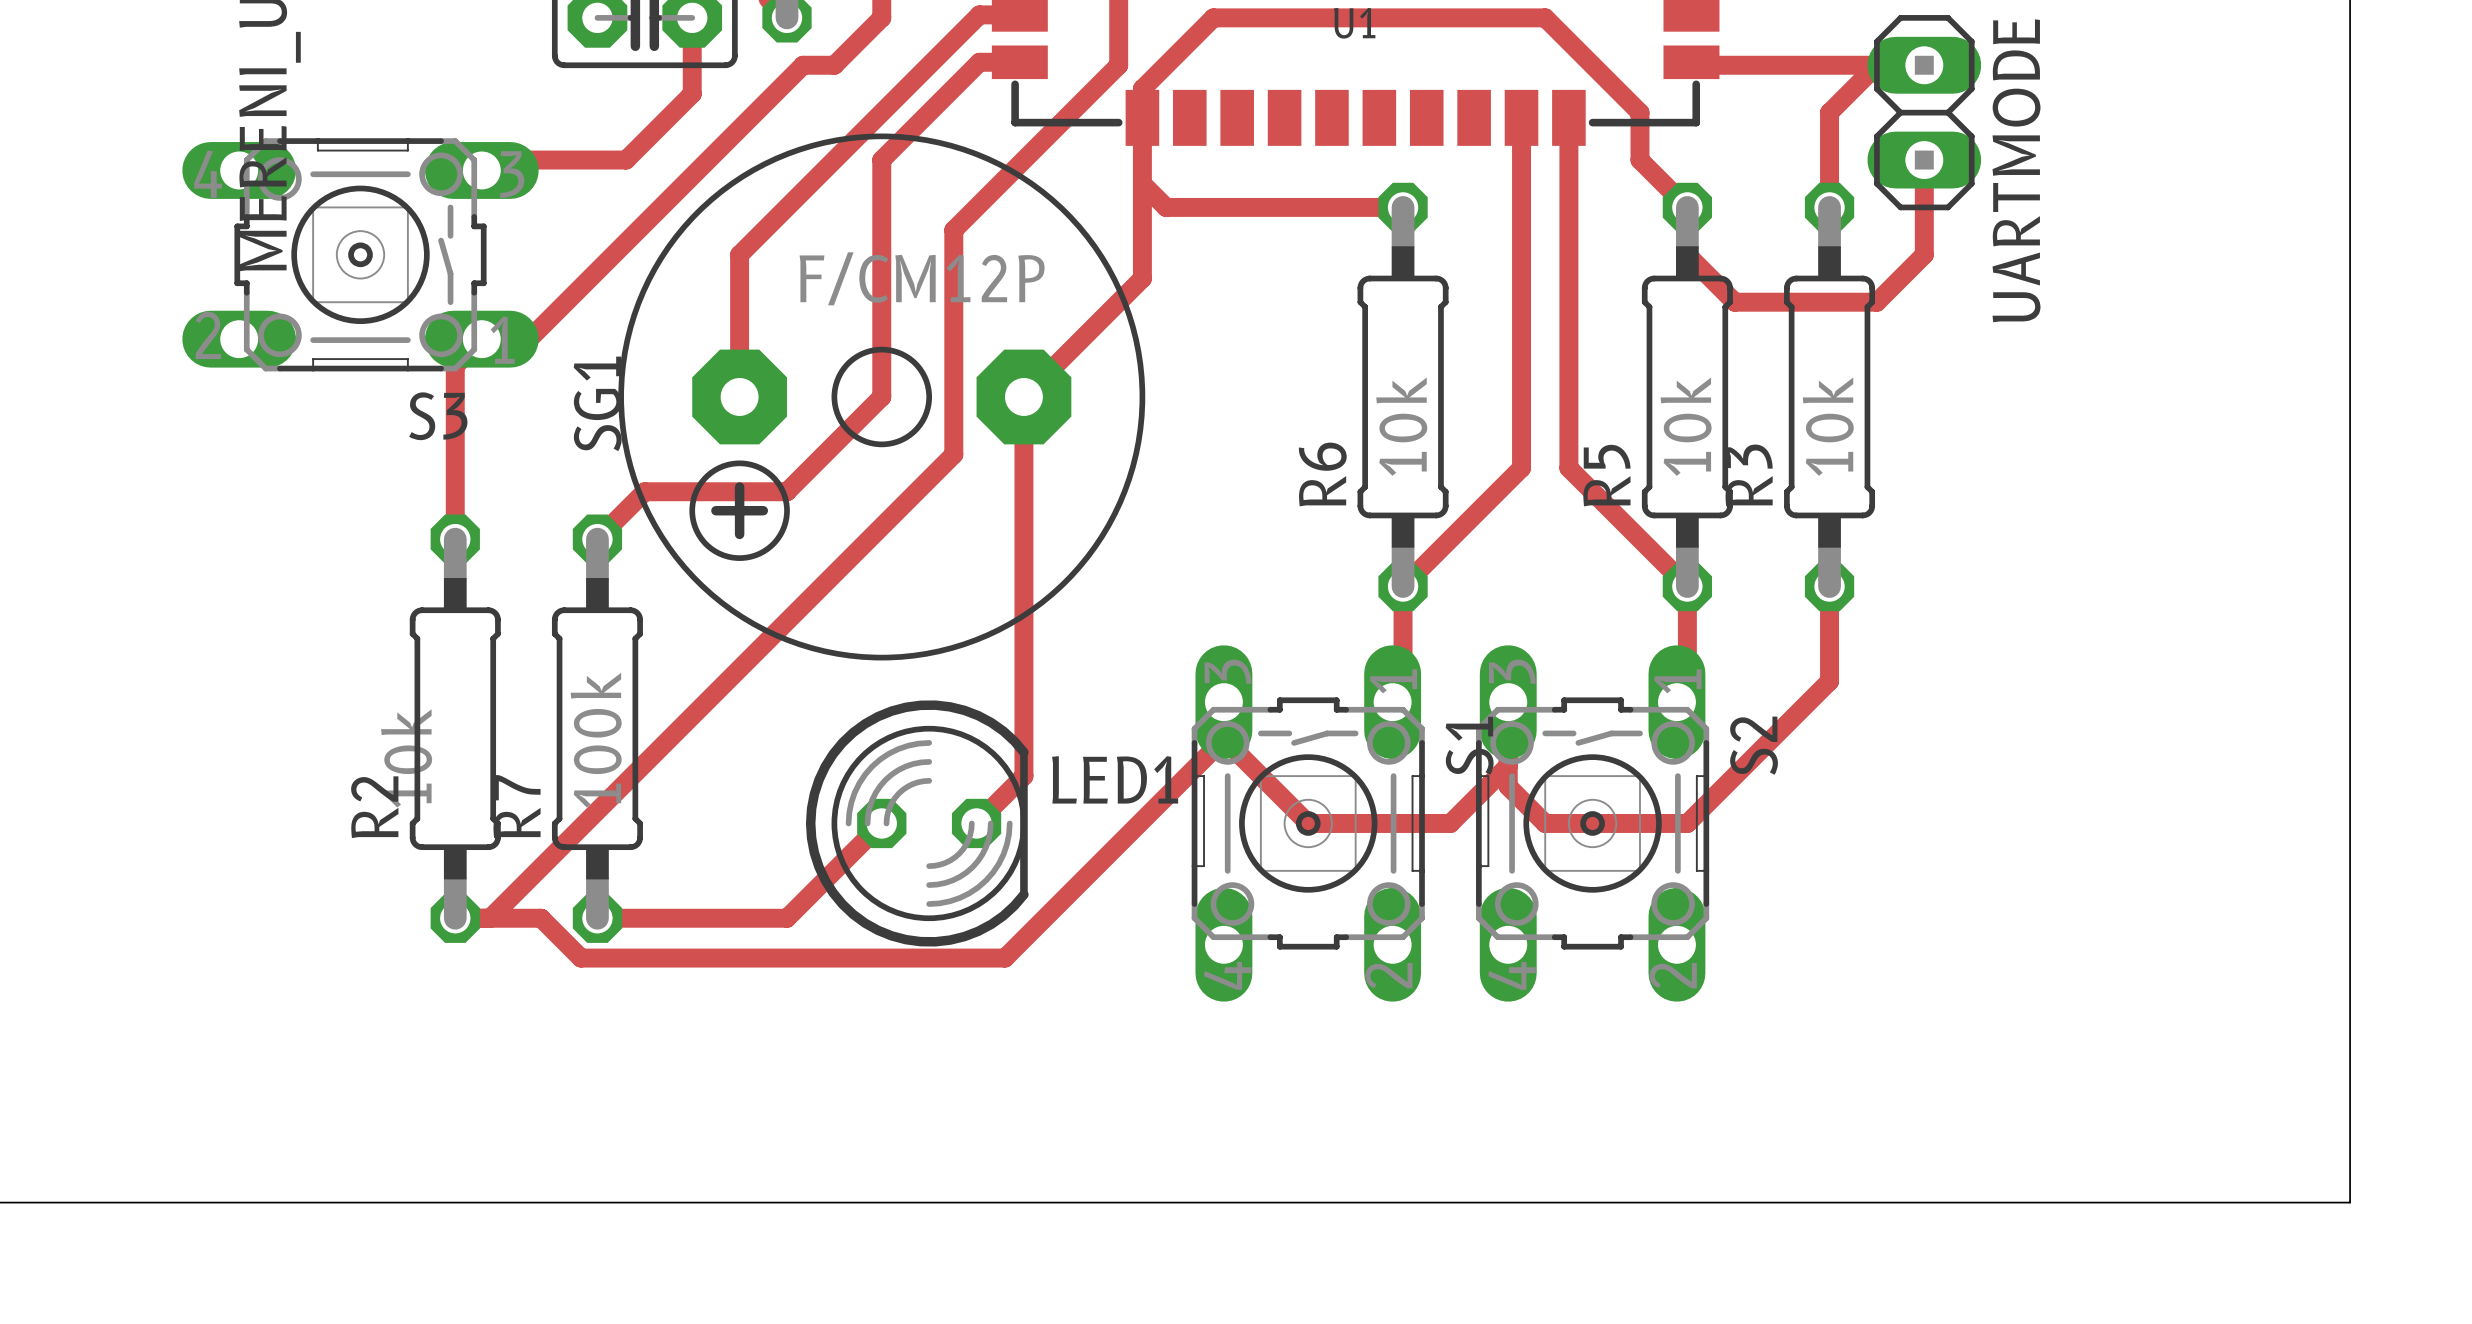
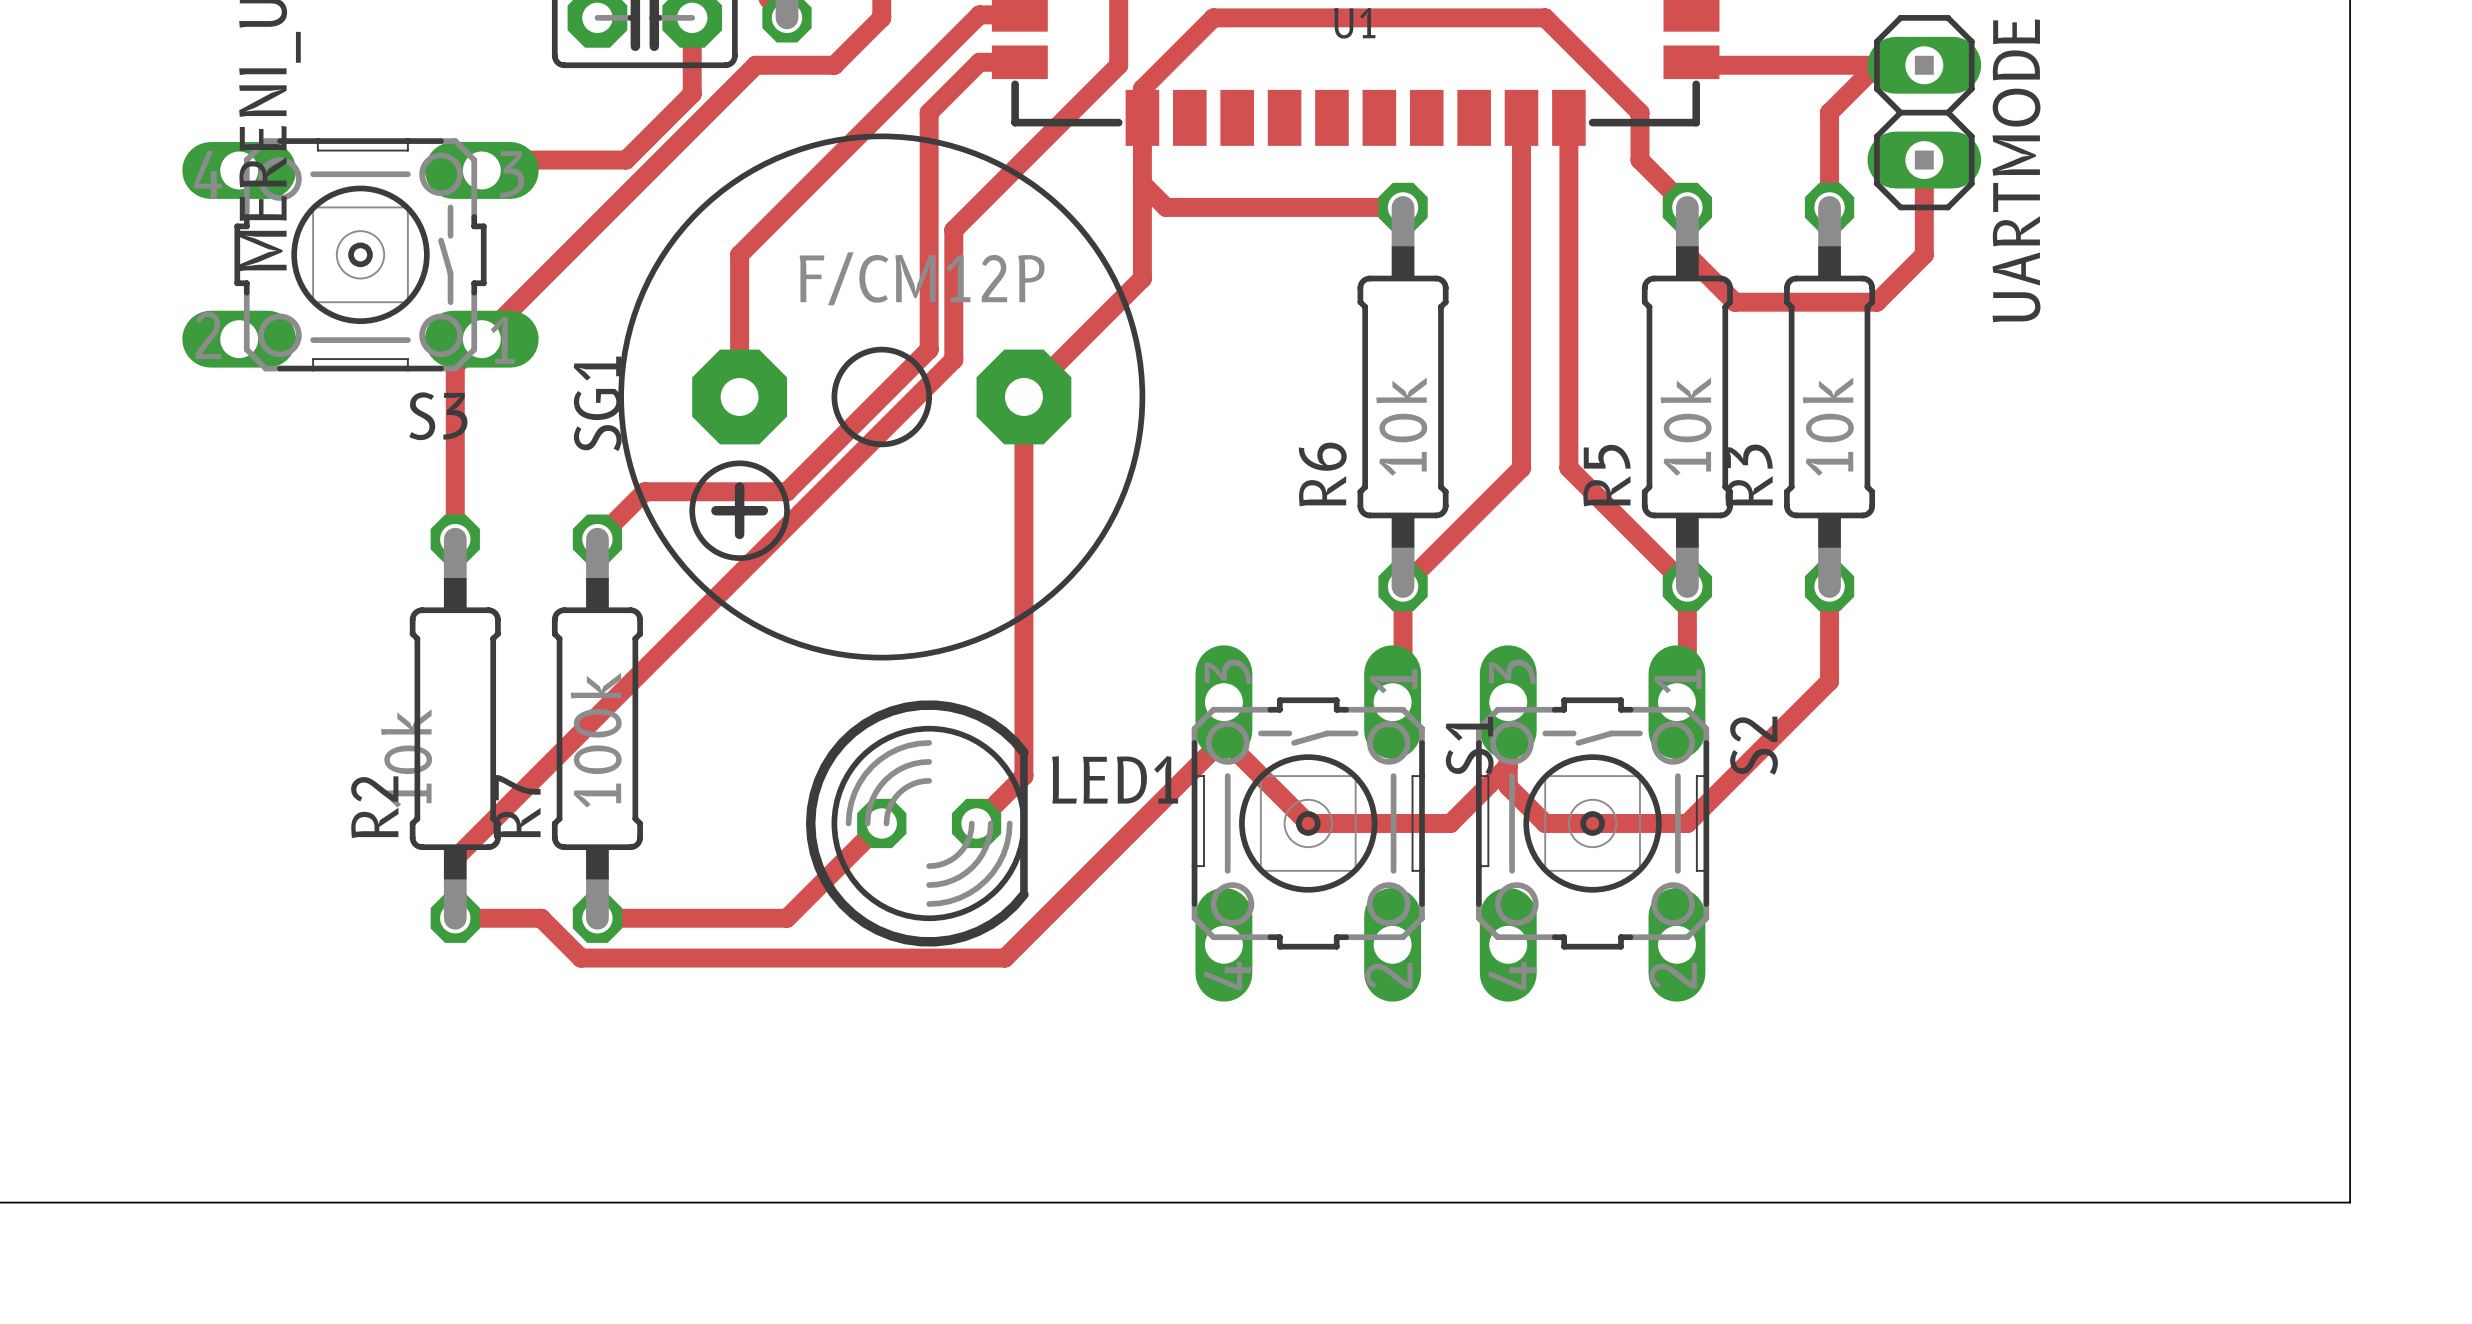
top track: (803, 65) (529, 339) (481, 339) -> (803, 65) (755, 65) (481, 339)
top track: (929, 112) (881, 160) (881, 396) -> (929, 112) (929, 349) (881, 396)
top track: (953, 359) (953, 454) (490, 918) -> (953, 359) (455, 858) (455, 918)

